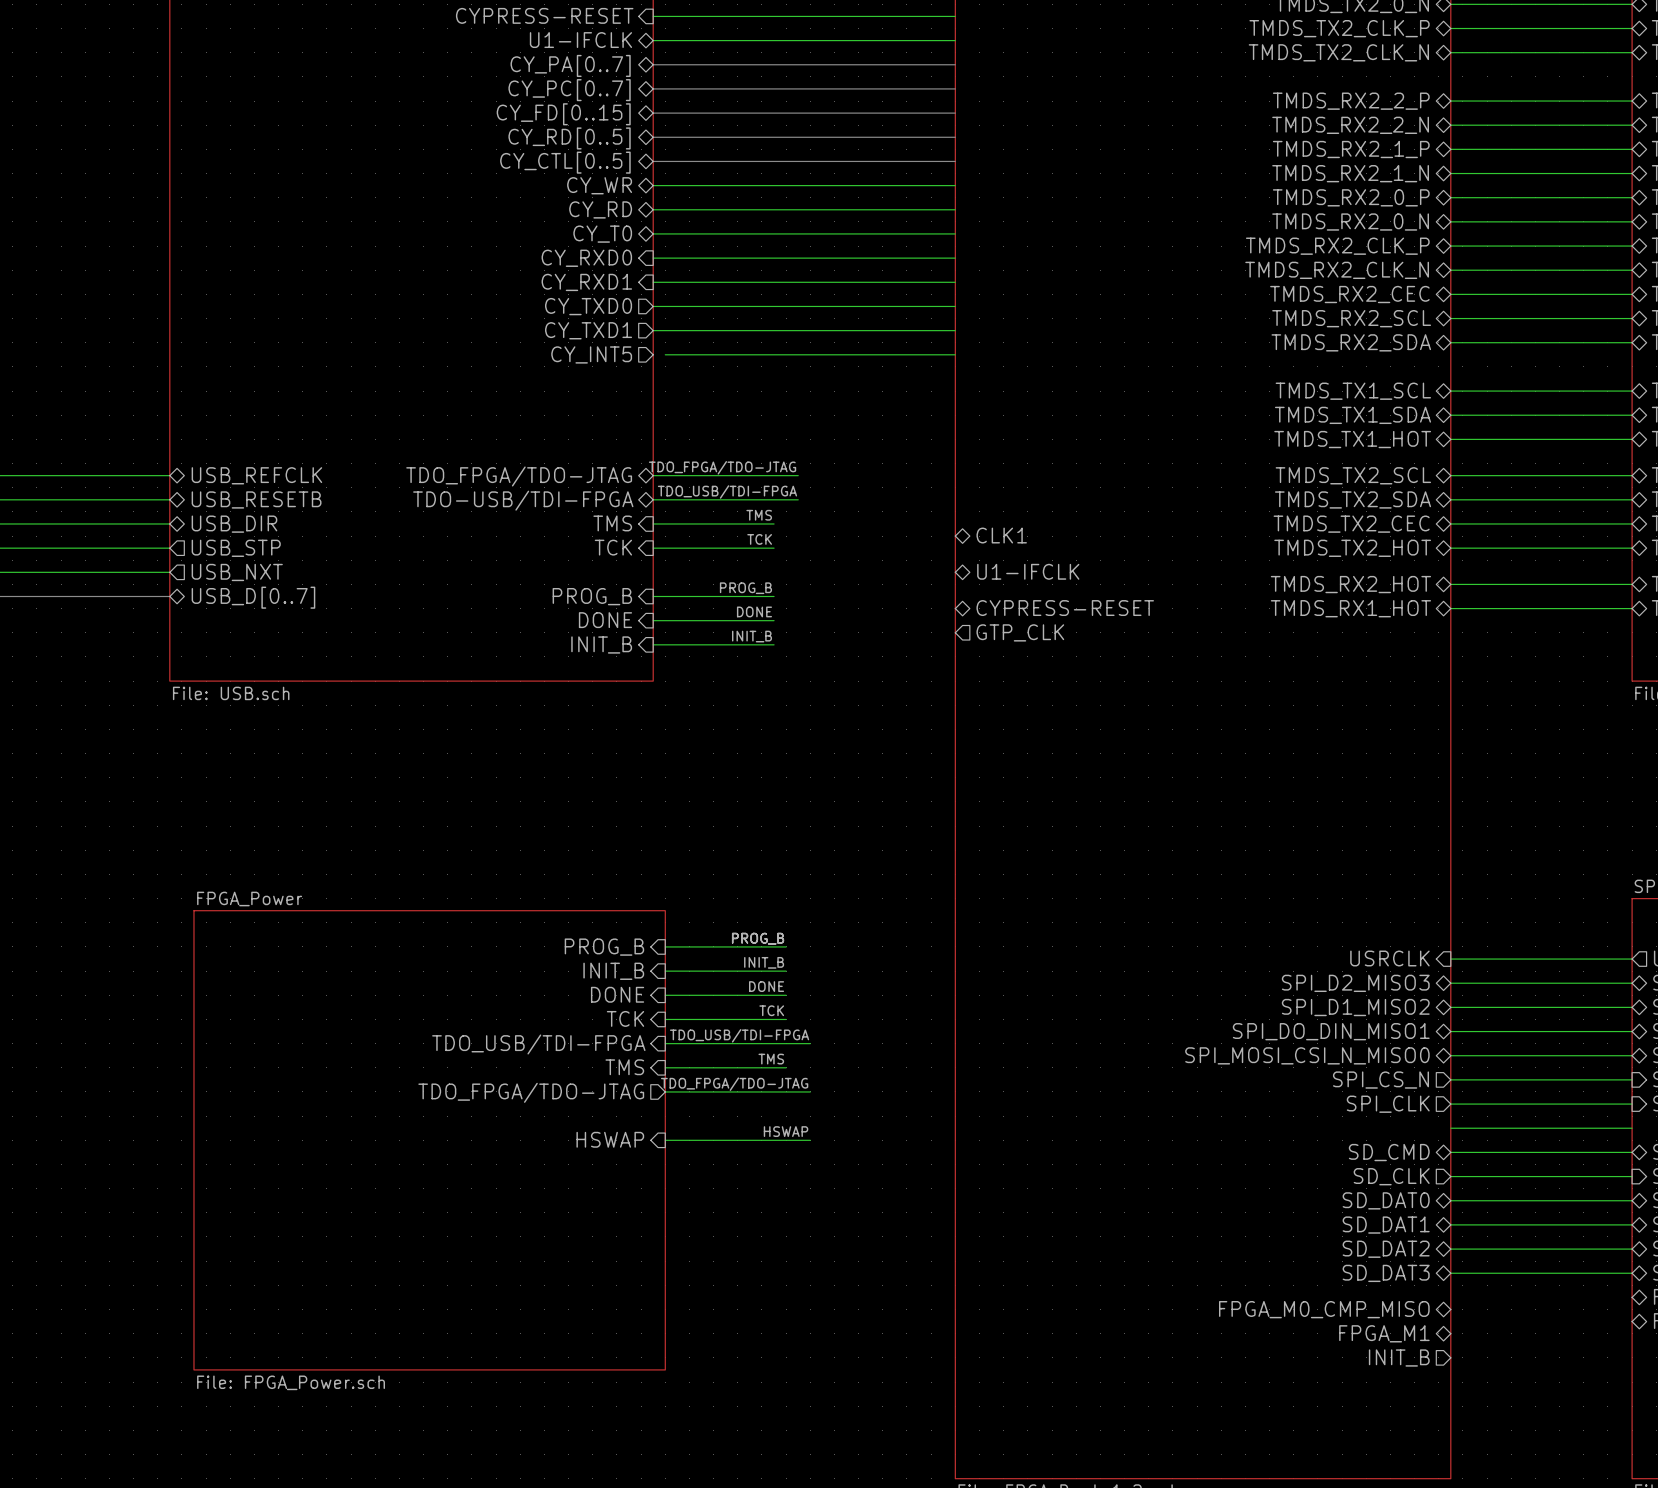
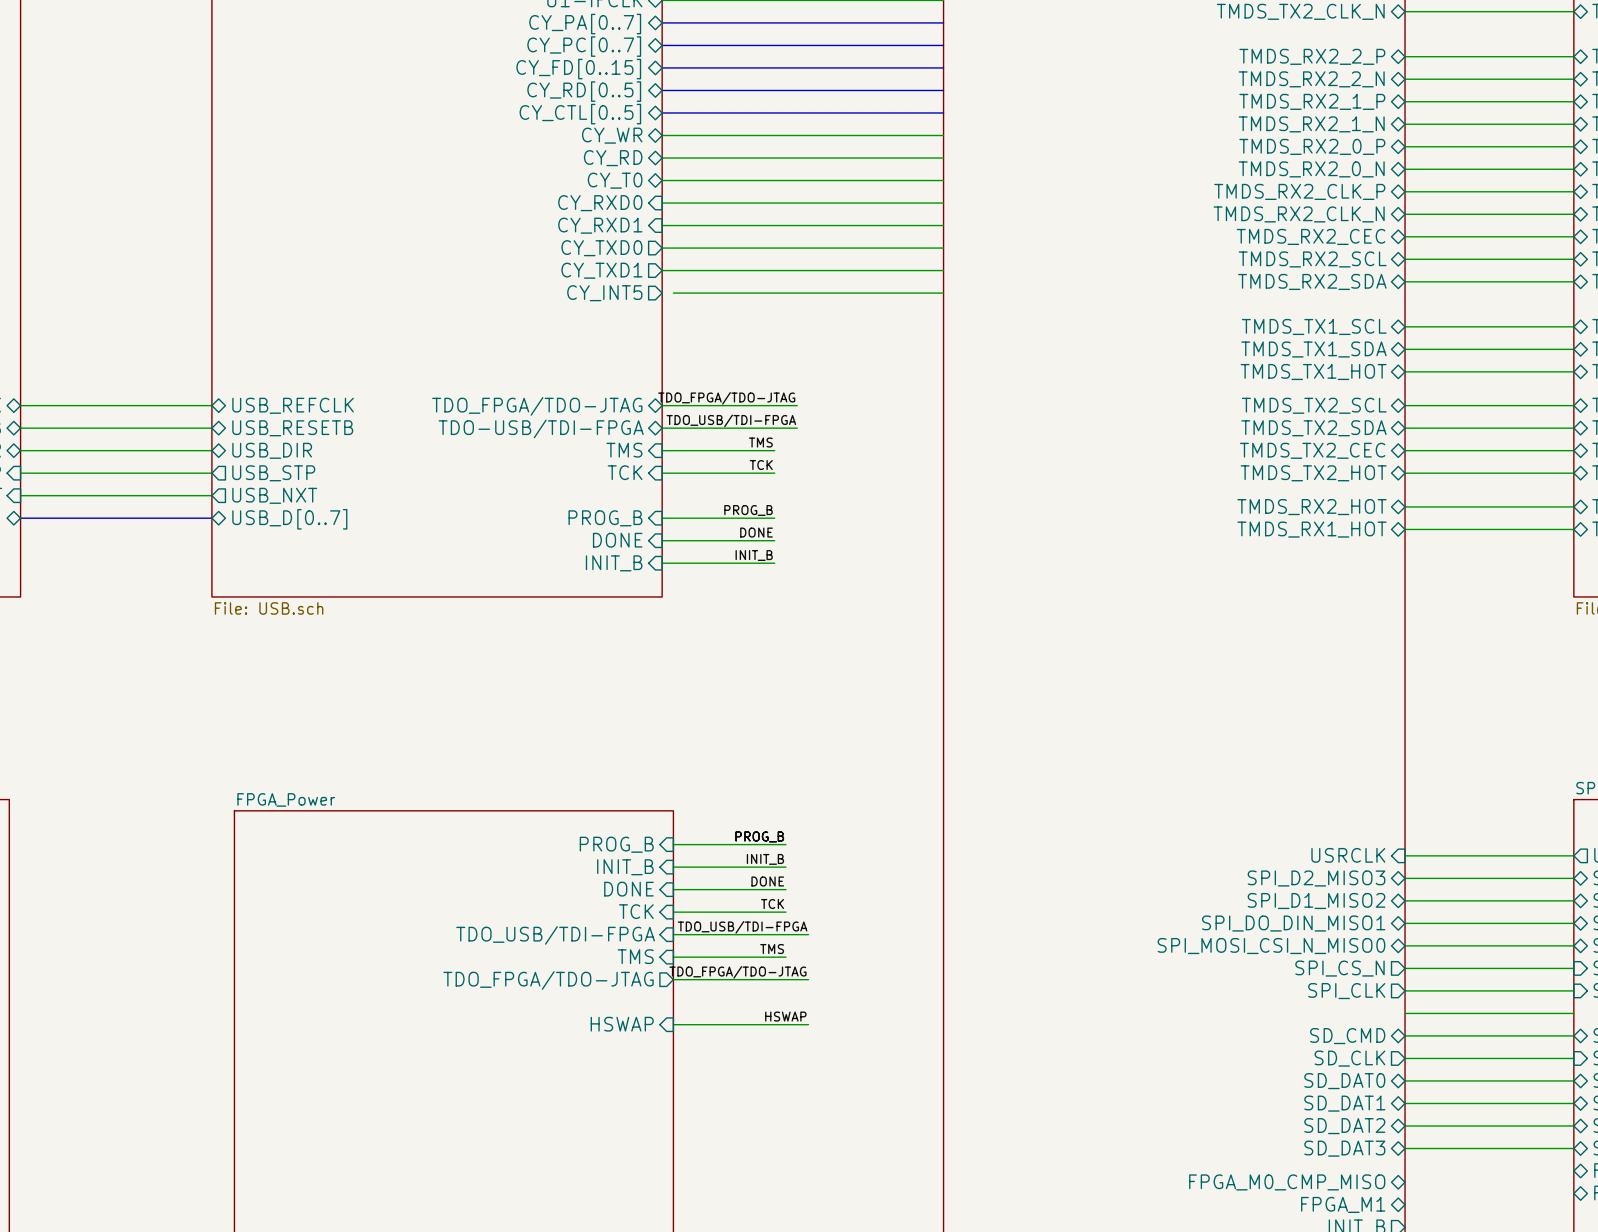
sheet pin: CLK1 (1001, 535) -> none
sheet pin: U1-IFCLK (1028, 571) -> none
sheet pin: CYPRESS-RESET (1065, 608) -> none
sheet pin: GTP_CLK (1020, 632) -> none

